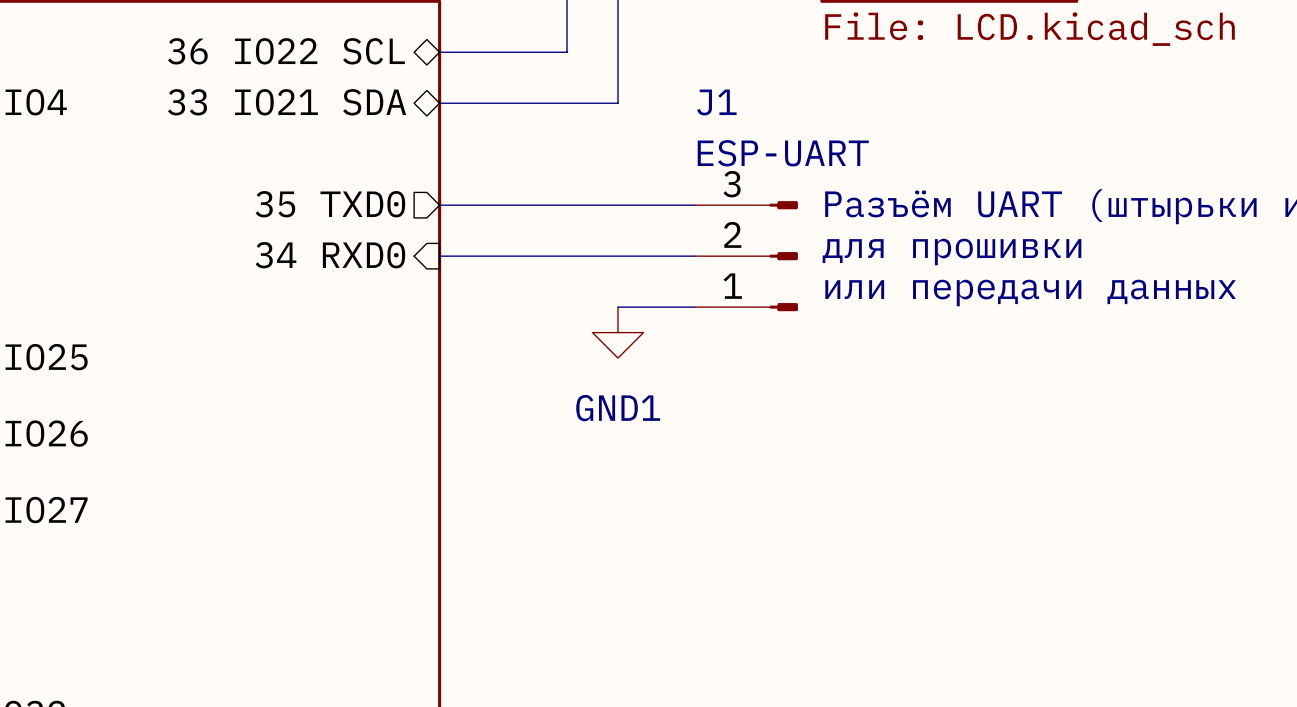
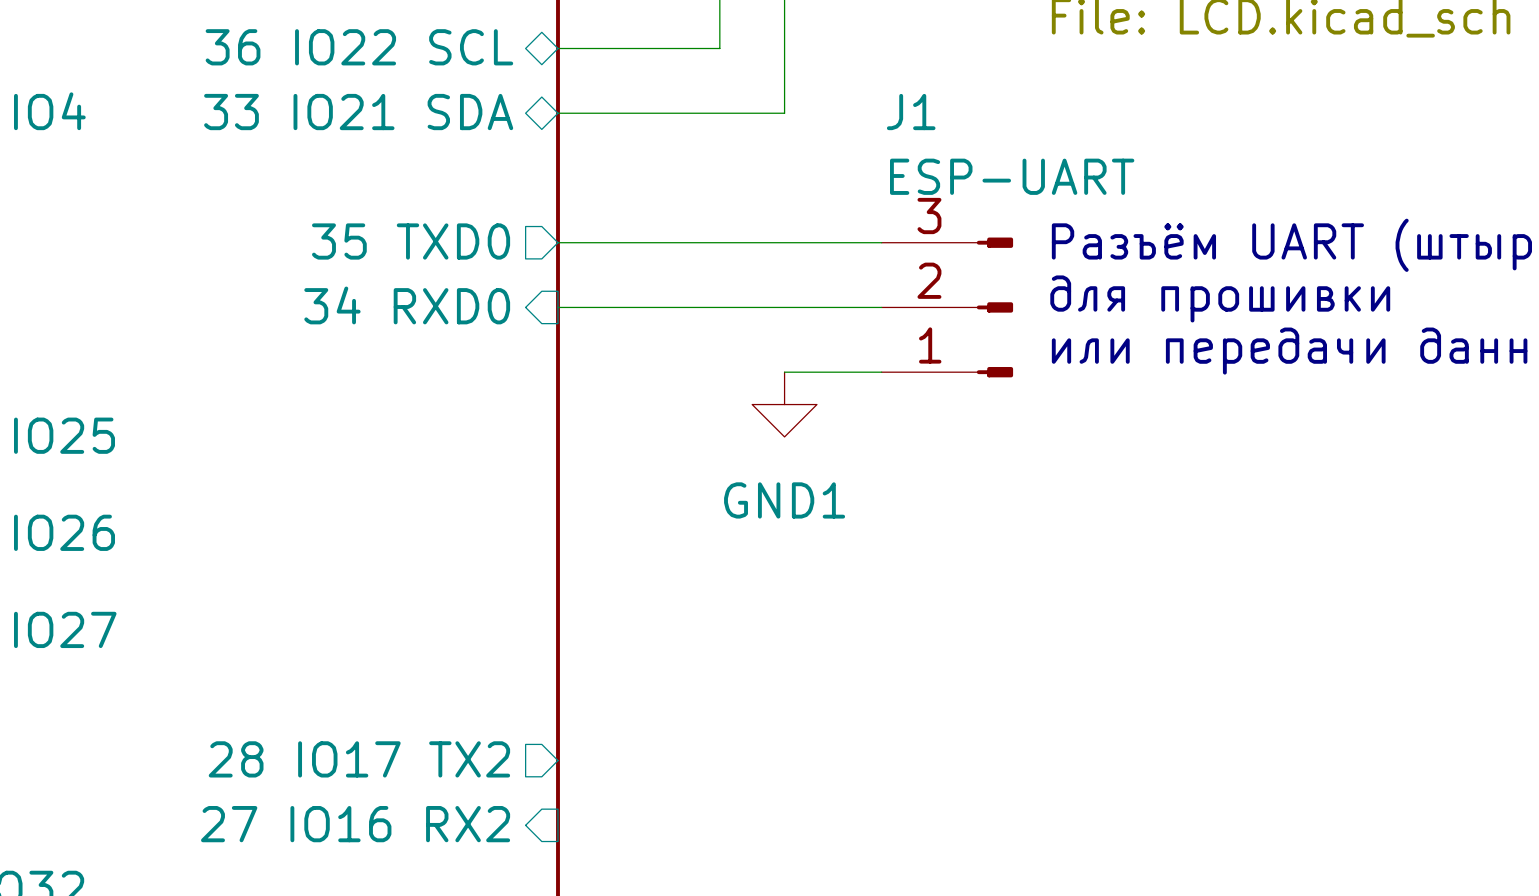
sheet pin: none -> 28 IO17 TX2 (359, 759)
sheet pin: none -> 27 IO16 RX2 (355, 824)

